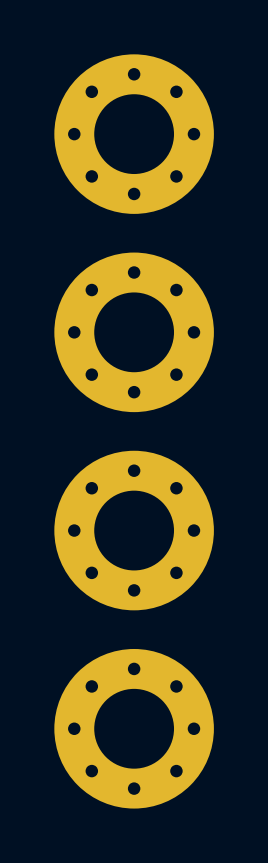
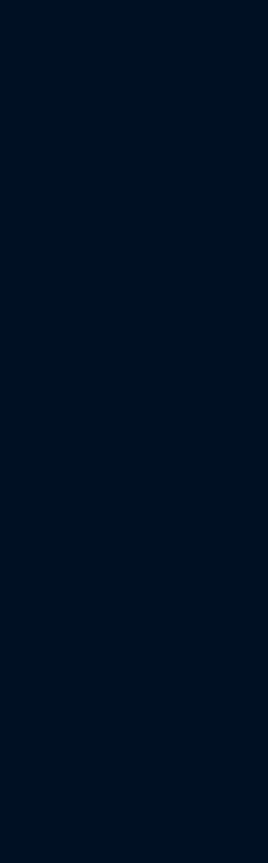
part: (134, 134) -> none
part: (134, 332) -> none
part: (134, 530) -> none
part: (134, 728) -> none

